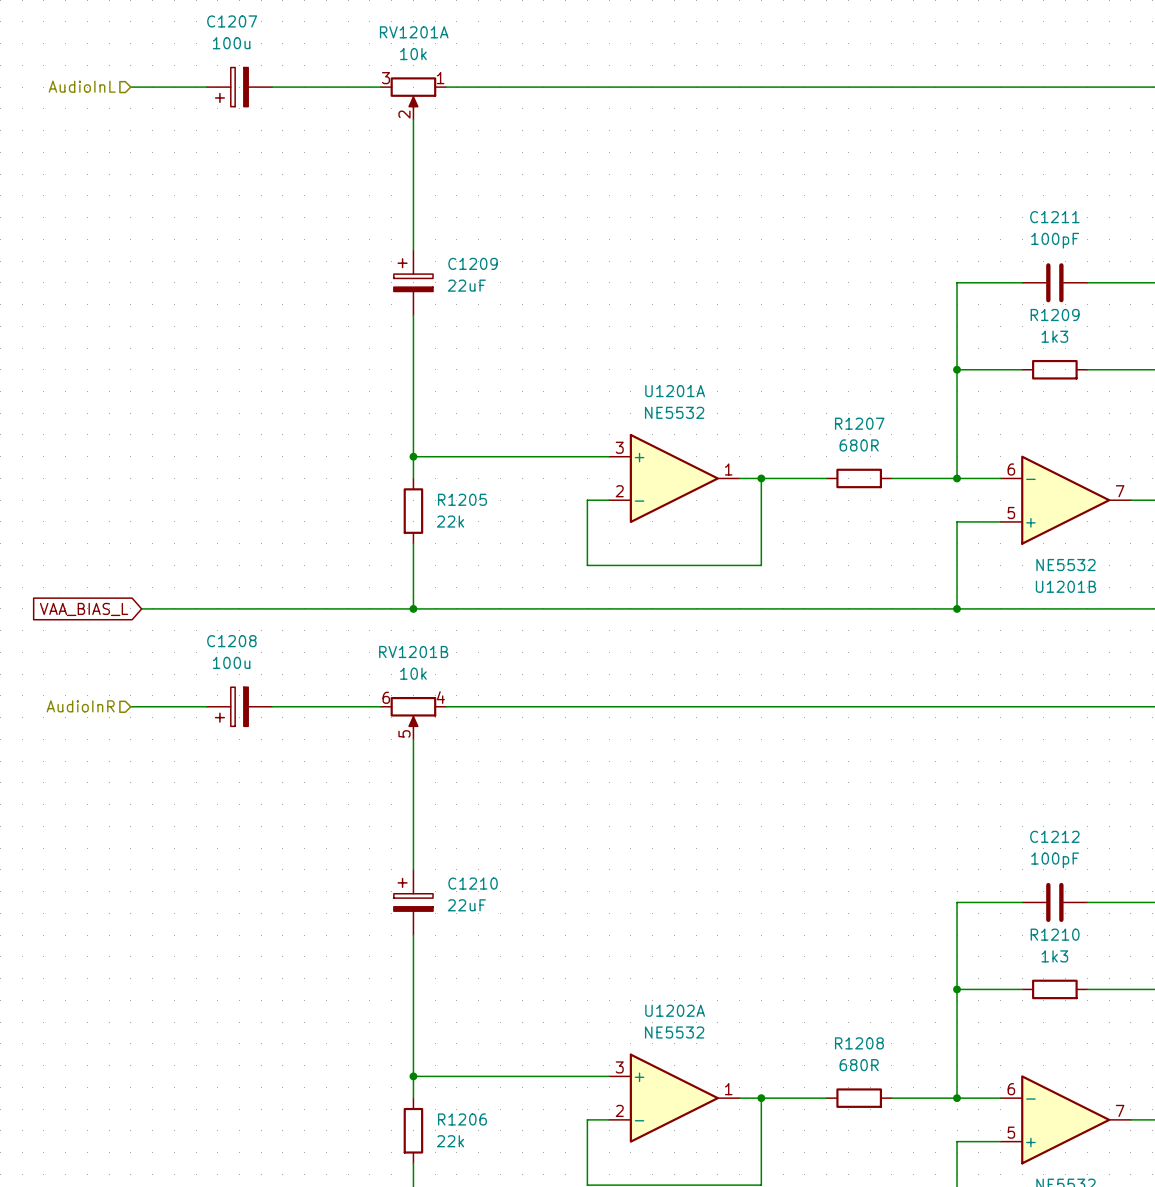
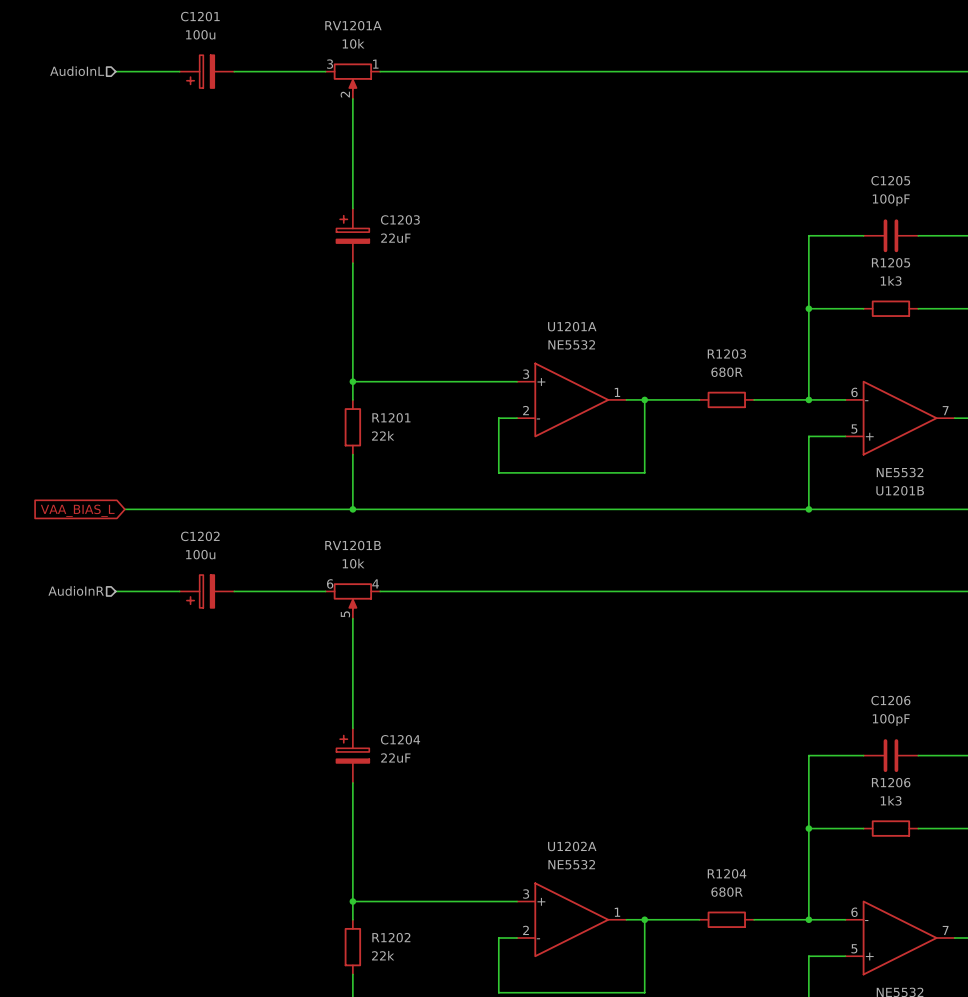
C1207 name: C1207 (232, 21) -> C1201 (200, 16)
C1211 name: C1211 (1054, 217) -> C1205 (890, 180)
C1209 name: C1209 (473, 263) -> C1203 (400, 219)
R1209 name: R1209 (1055, 314) -> R1205 (891, 262)
R1207 name: R1207 (859, 423) -> R1203 (726, 354)
R1205 name: R1205 (462, 499) -> R1201 (391, 417)
C1208 name: C1208 (231, 641) -> C1202 (200, 536)
C1212 name: C1212 (1054, 836) -> C1206 (890, 700)
C1210 name: C1210 (473, 883) -> C1204 (400, 739)
R1210 name: R1210 (1055, 934) -> R1206 (891, 782)
R1208 name: R1208 (859, 1043) -> R1204 (727, 873)
R1206 name: R1206 (462, 1119) -> R1202 (391, 937)

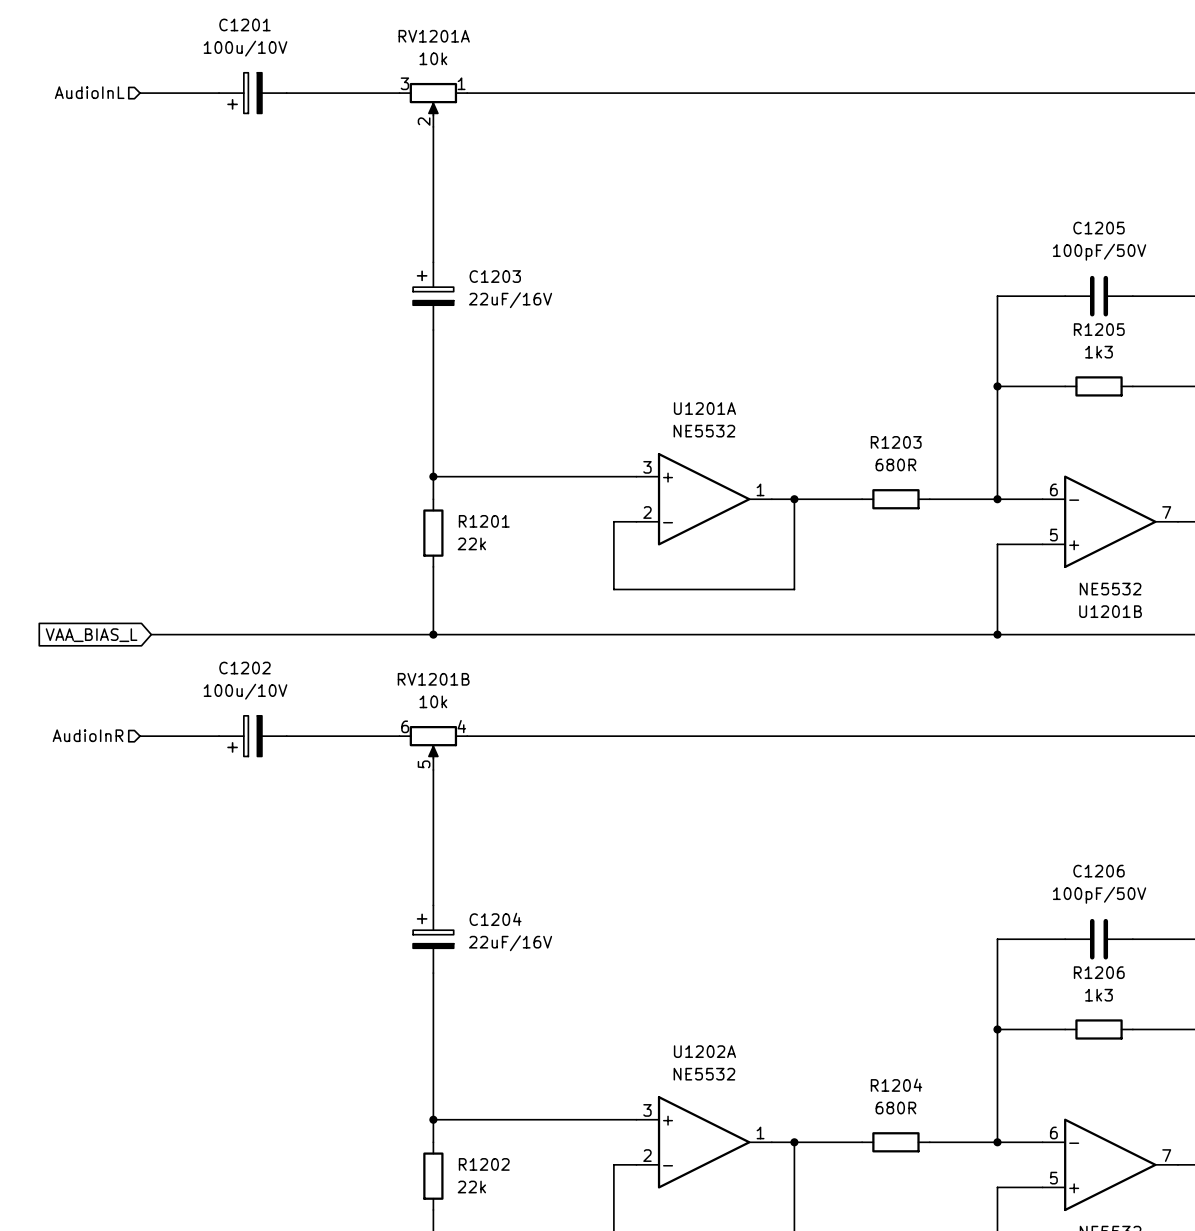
C1201 value: 100u (200, 34) -> 100u/10V (245, 48)
C1205 value: 100pF (891, 200) -> 100pF/50V (1099, 252)
C1203 value: 22uF (395, 238) -> 22uF/16V (510, 300)
C1202 value: 100u (200, 554) -> 100u/10V (245, 691)
C1206 value: 100pF (891, 720) -> 100pF/50V (1099, 895)
C1204 value: 22uF (395, 758) -> 22uF/16V (510, 943)

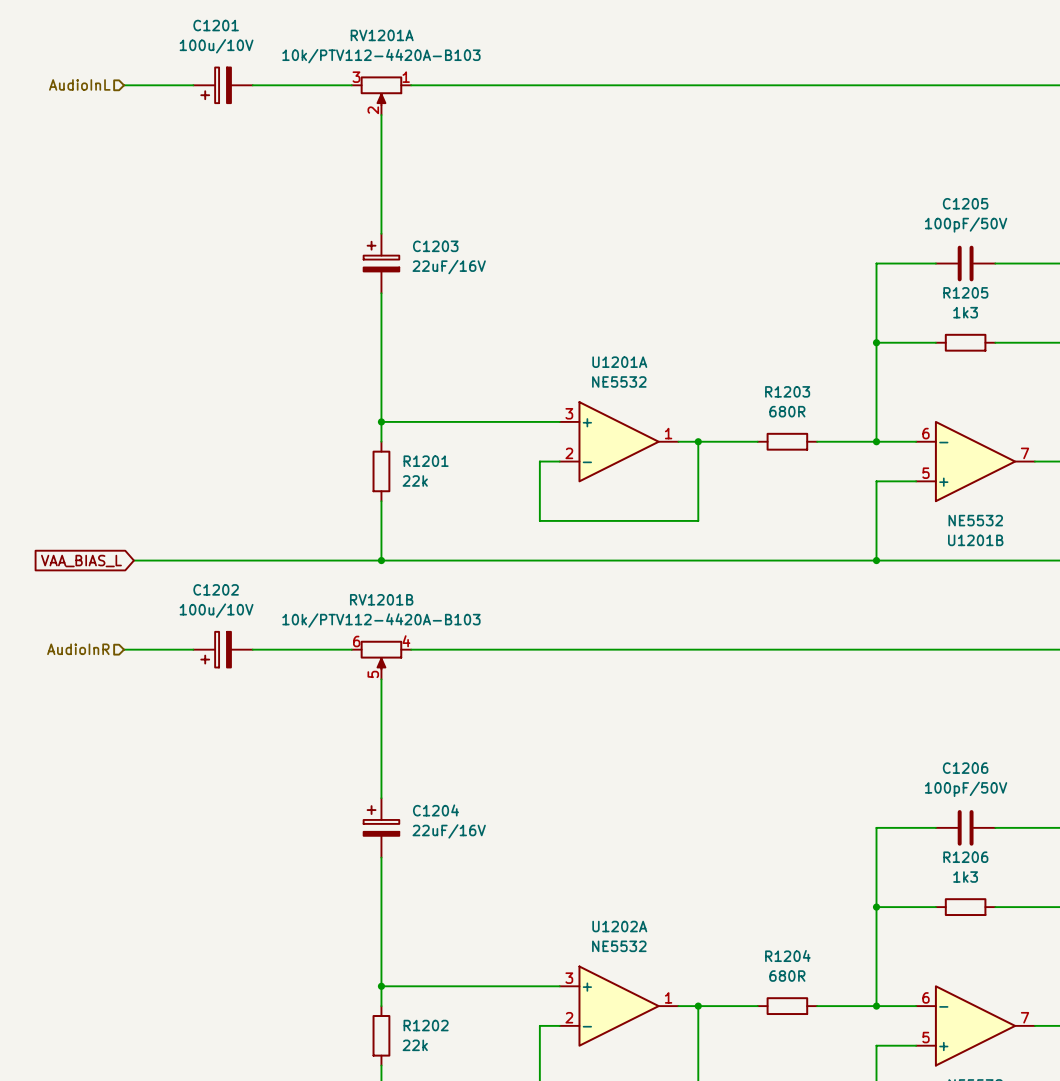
RV1201A value: 10k (433, 58) -> 10k/PTV112-4420A-B103 (381, 56)
RV1201B value: 10k (433, 701) -> 10k/PTV112-4420A-B103 (381, 620)

